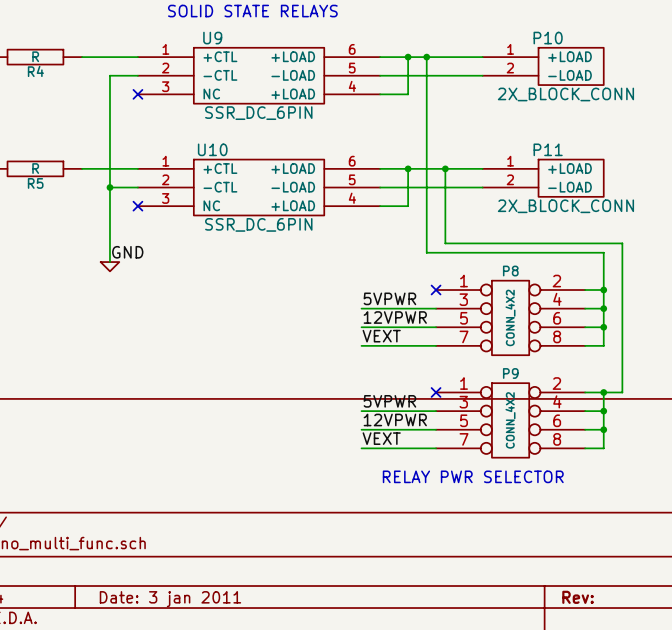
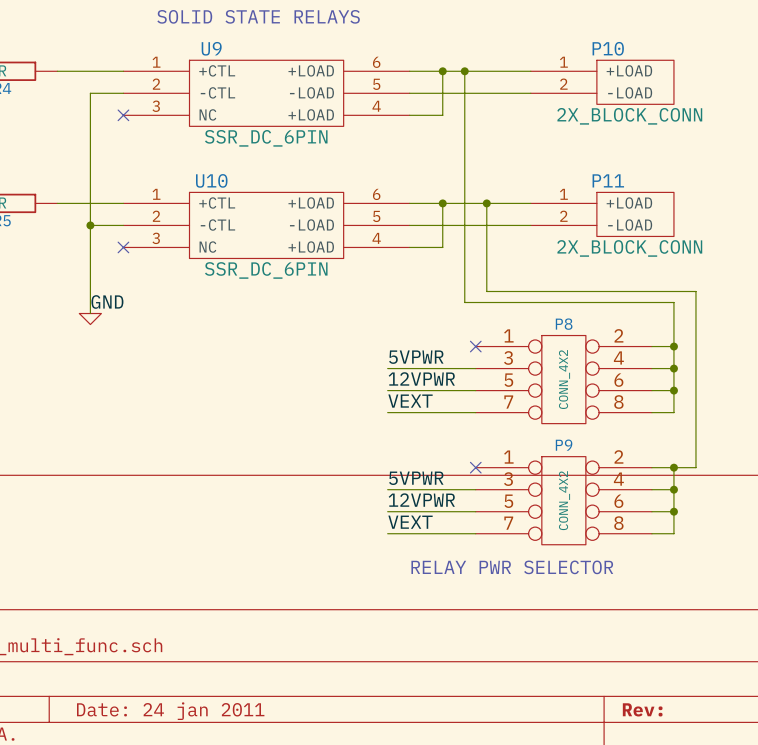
title block: Date: 3 jan 2011 (170, 599) -> Date: 24 jan 2011 (170, 711)

